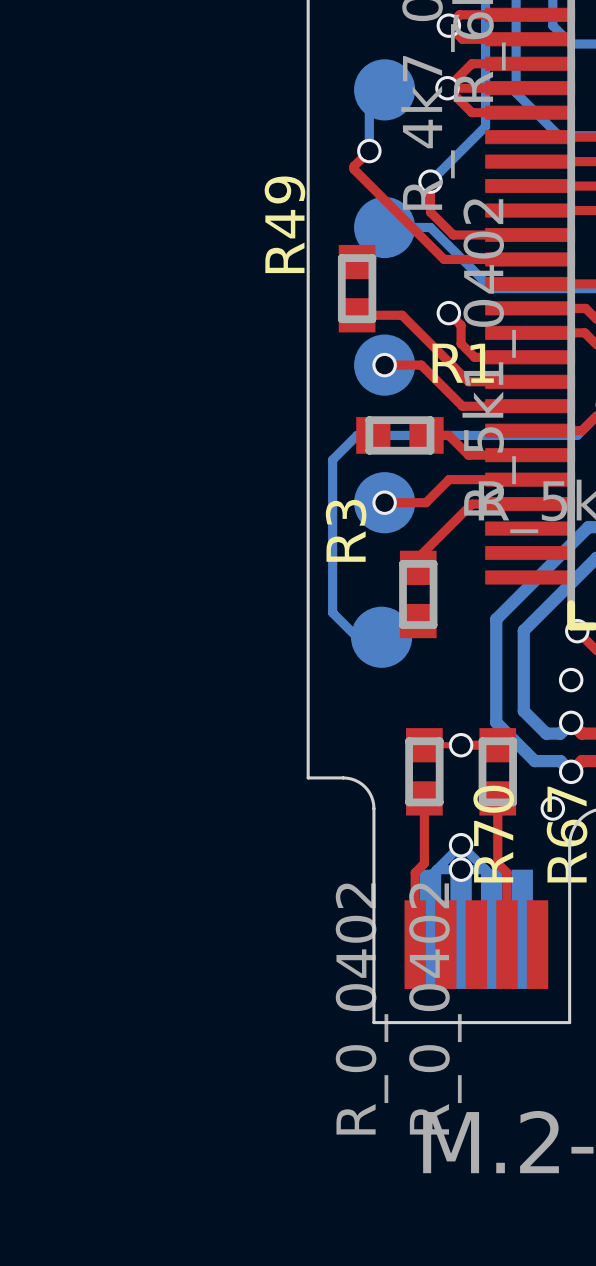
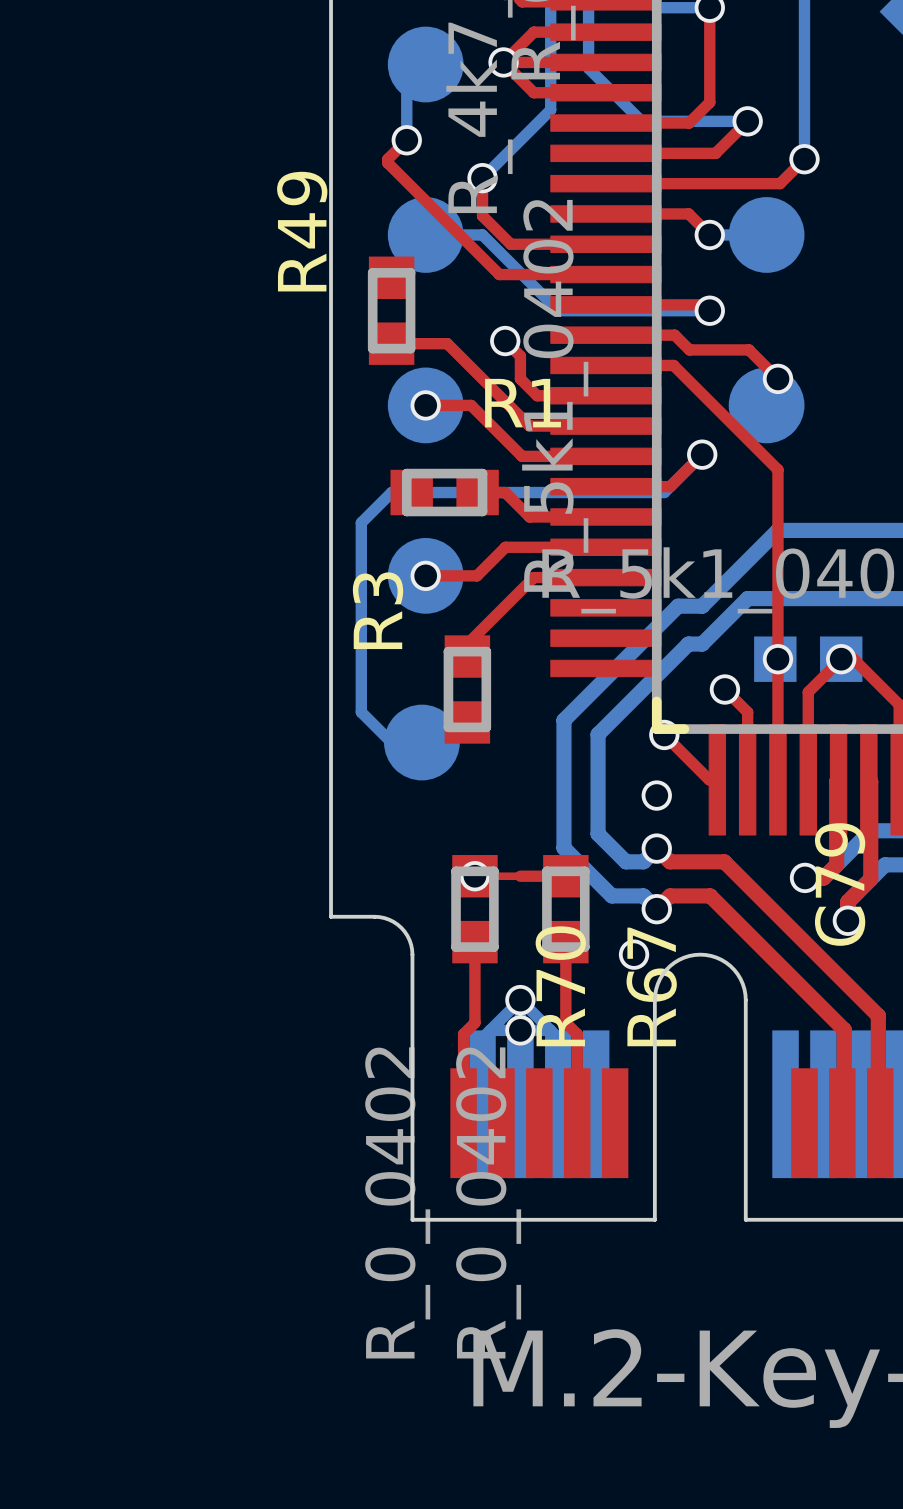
via position: (461, 745) -> (474, 876)

